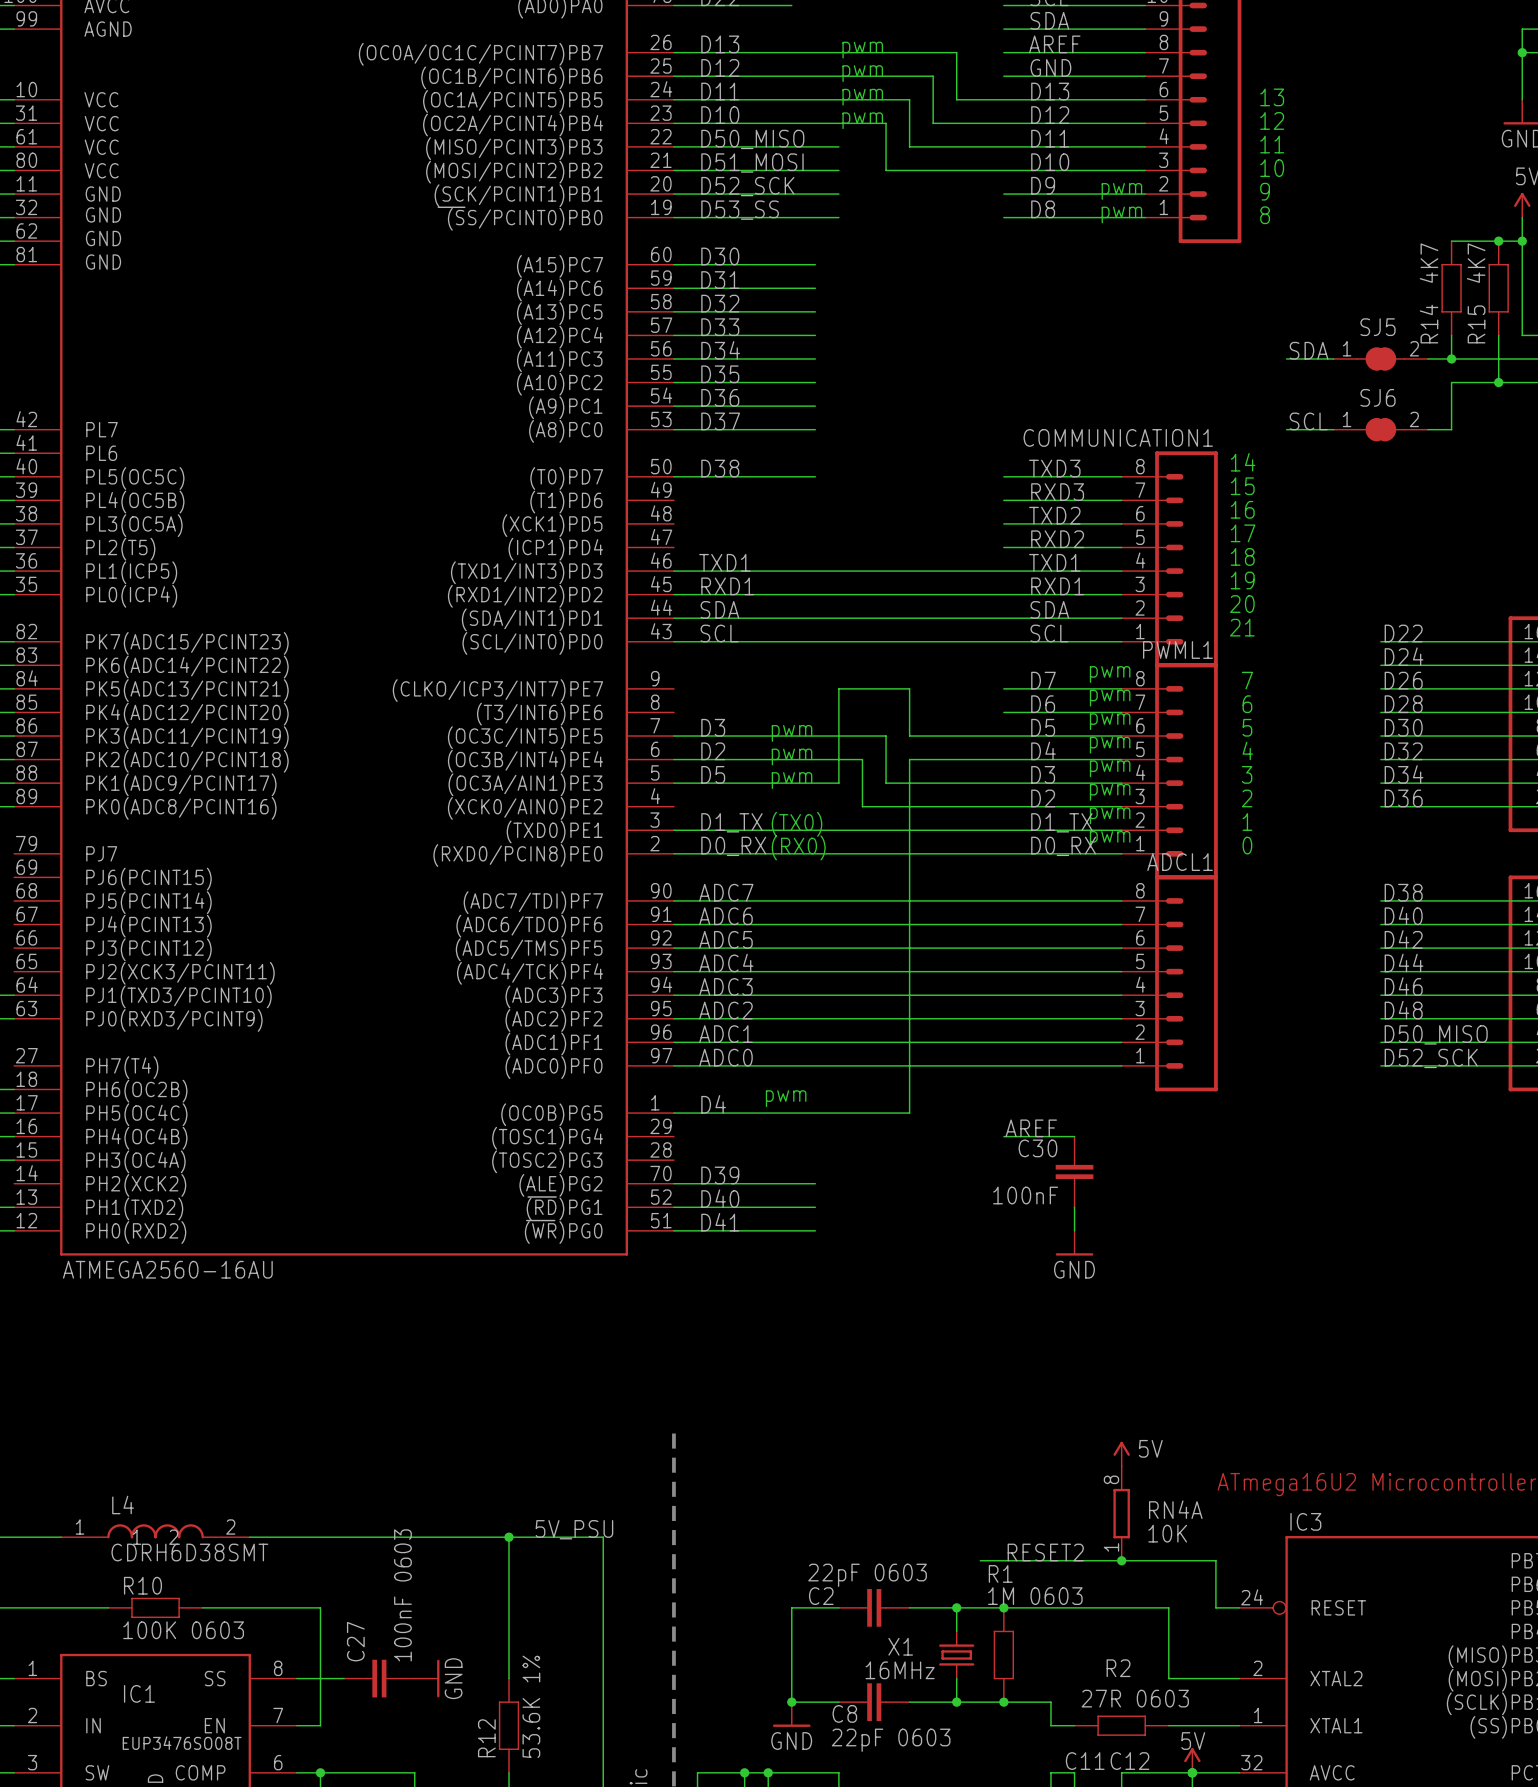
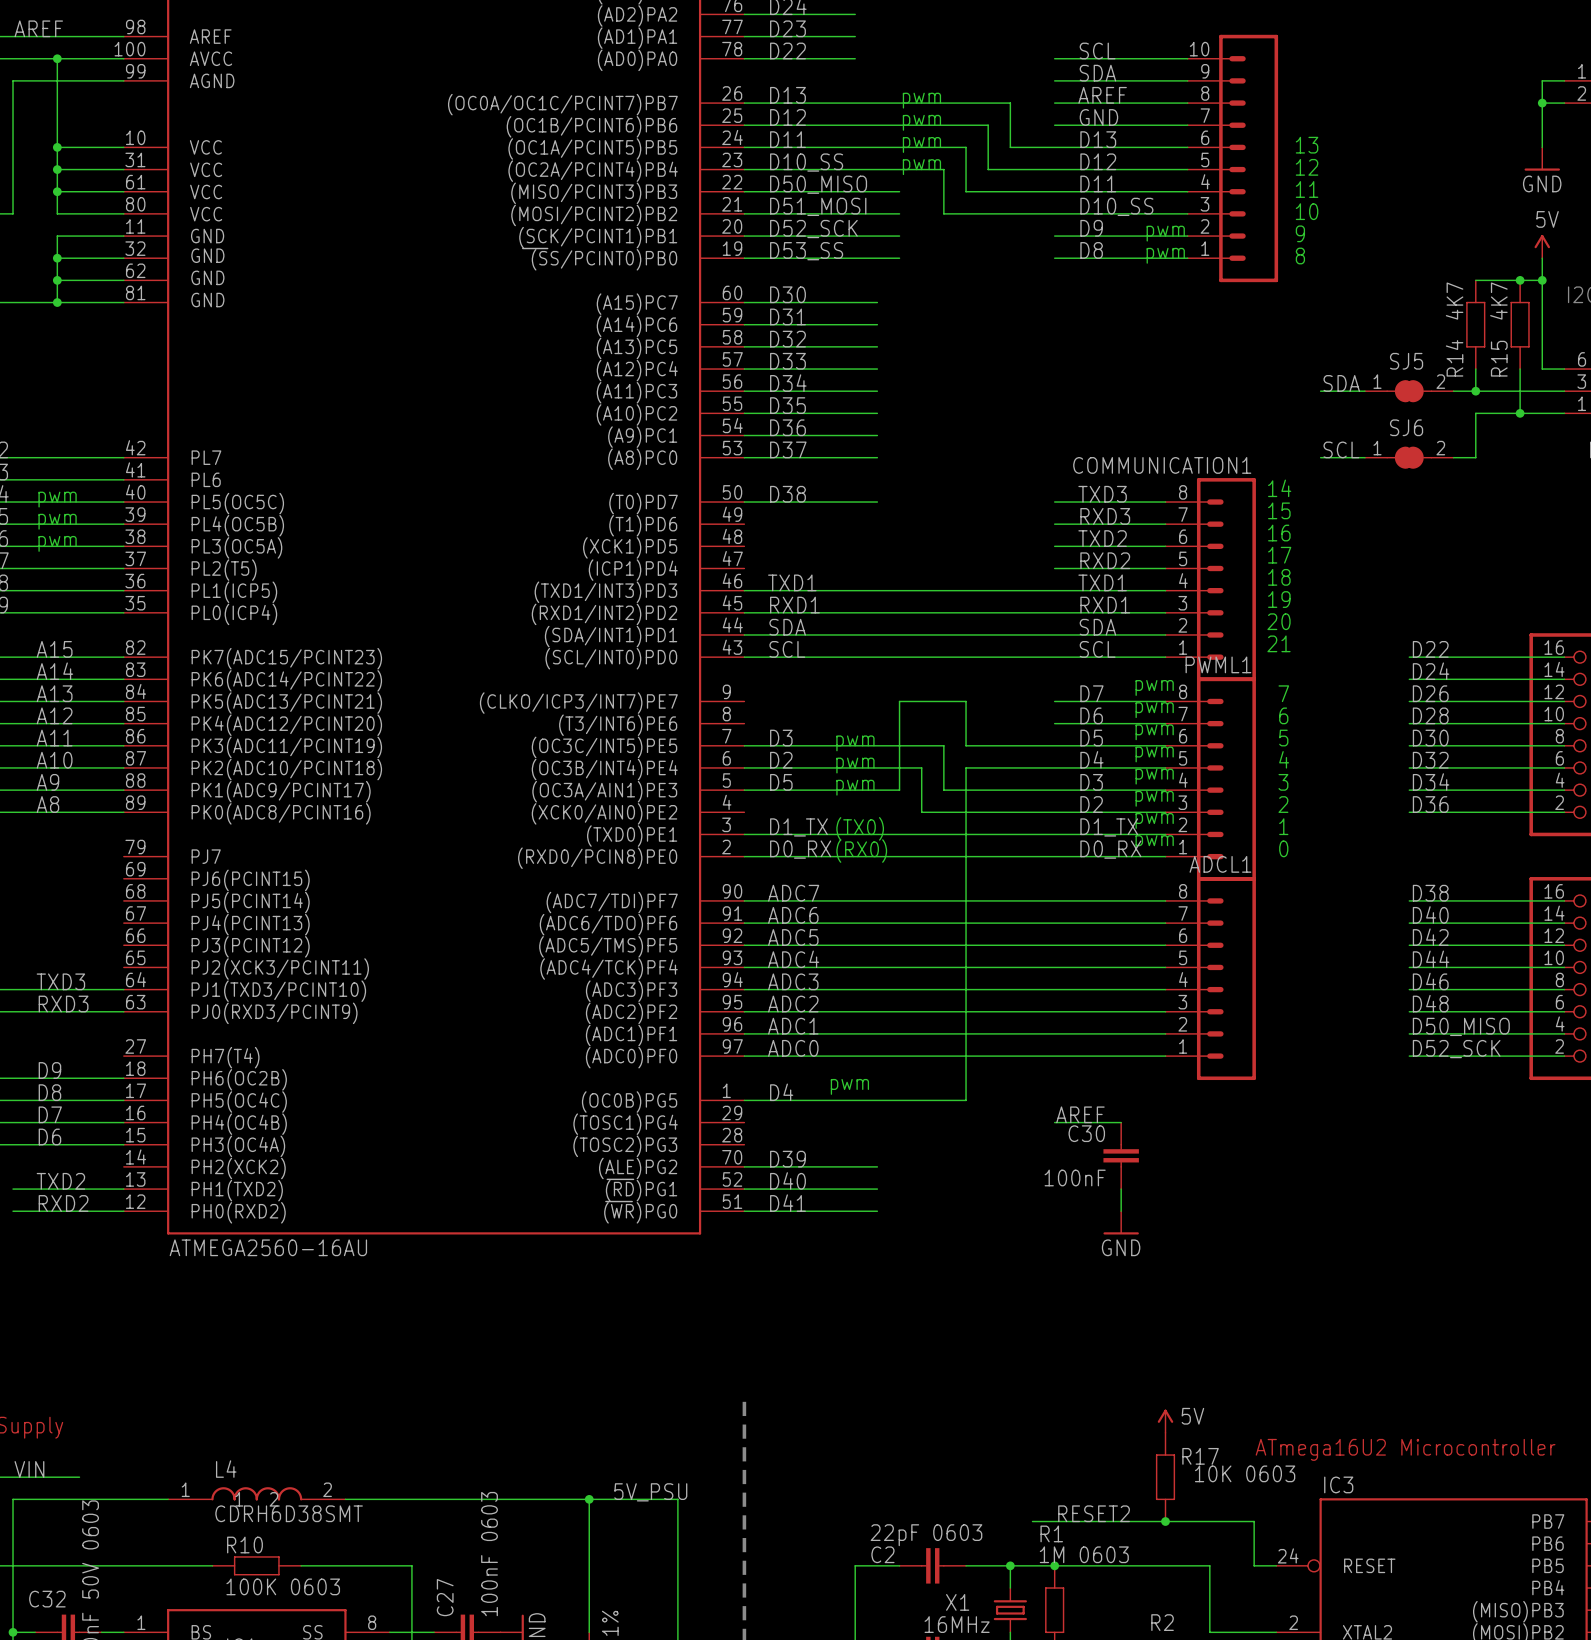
label: D10 (720, 115) -> D10_SS (806, 162)
label: D10 (1050, 162) -> D10_SS (1116, 206)
RN4A: 10K (1121, 1513) -> none
R17: none -> 10K 0603 (1165, 1477)

